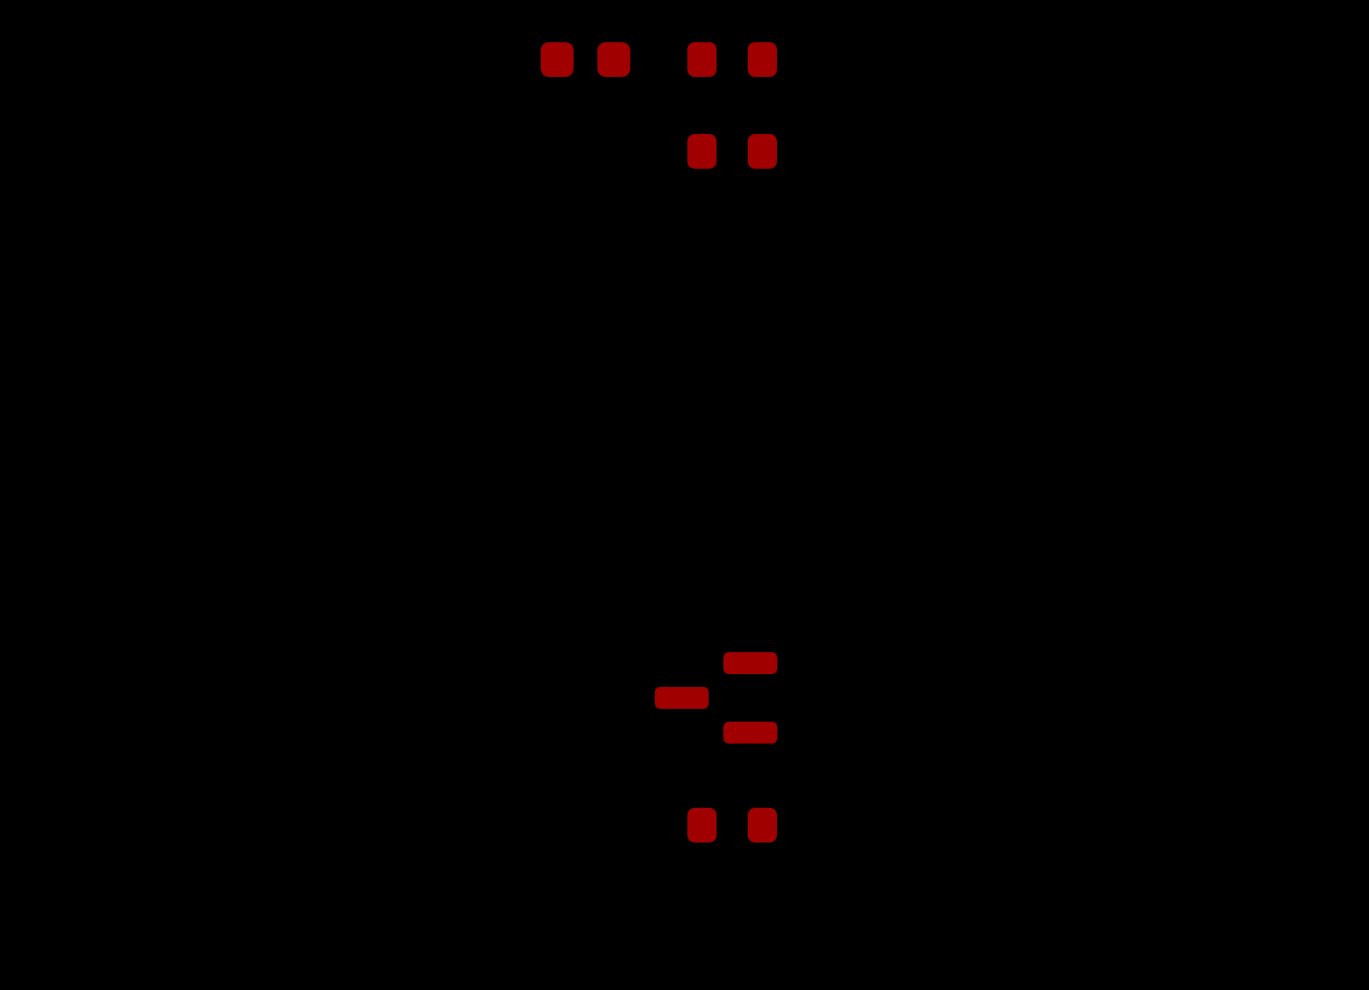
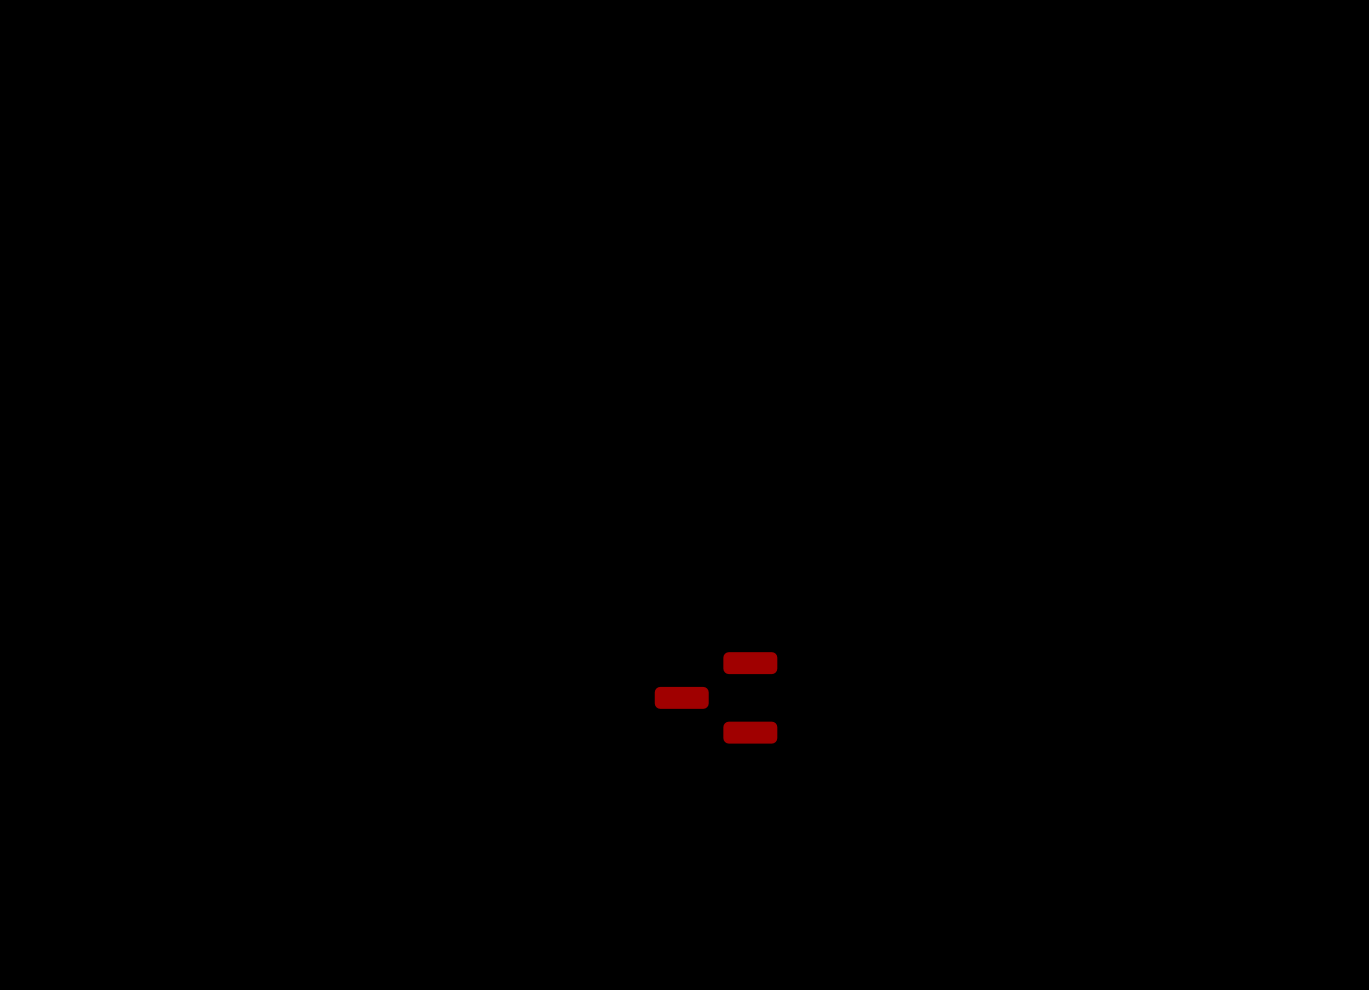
part: (585, 59) -> none
part: (732, 59) -> none
part: (732, 151) -> none
part: (732, 825) -> none

